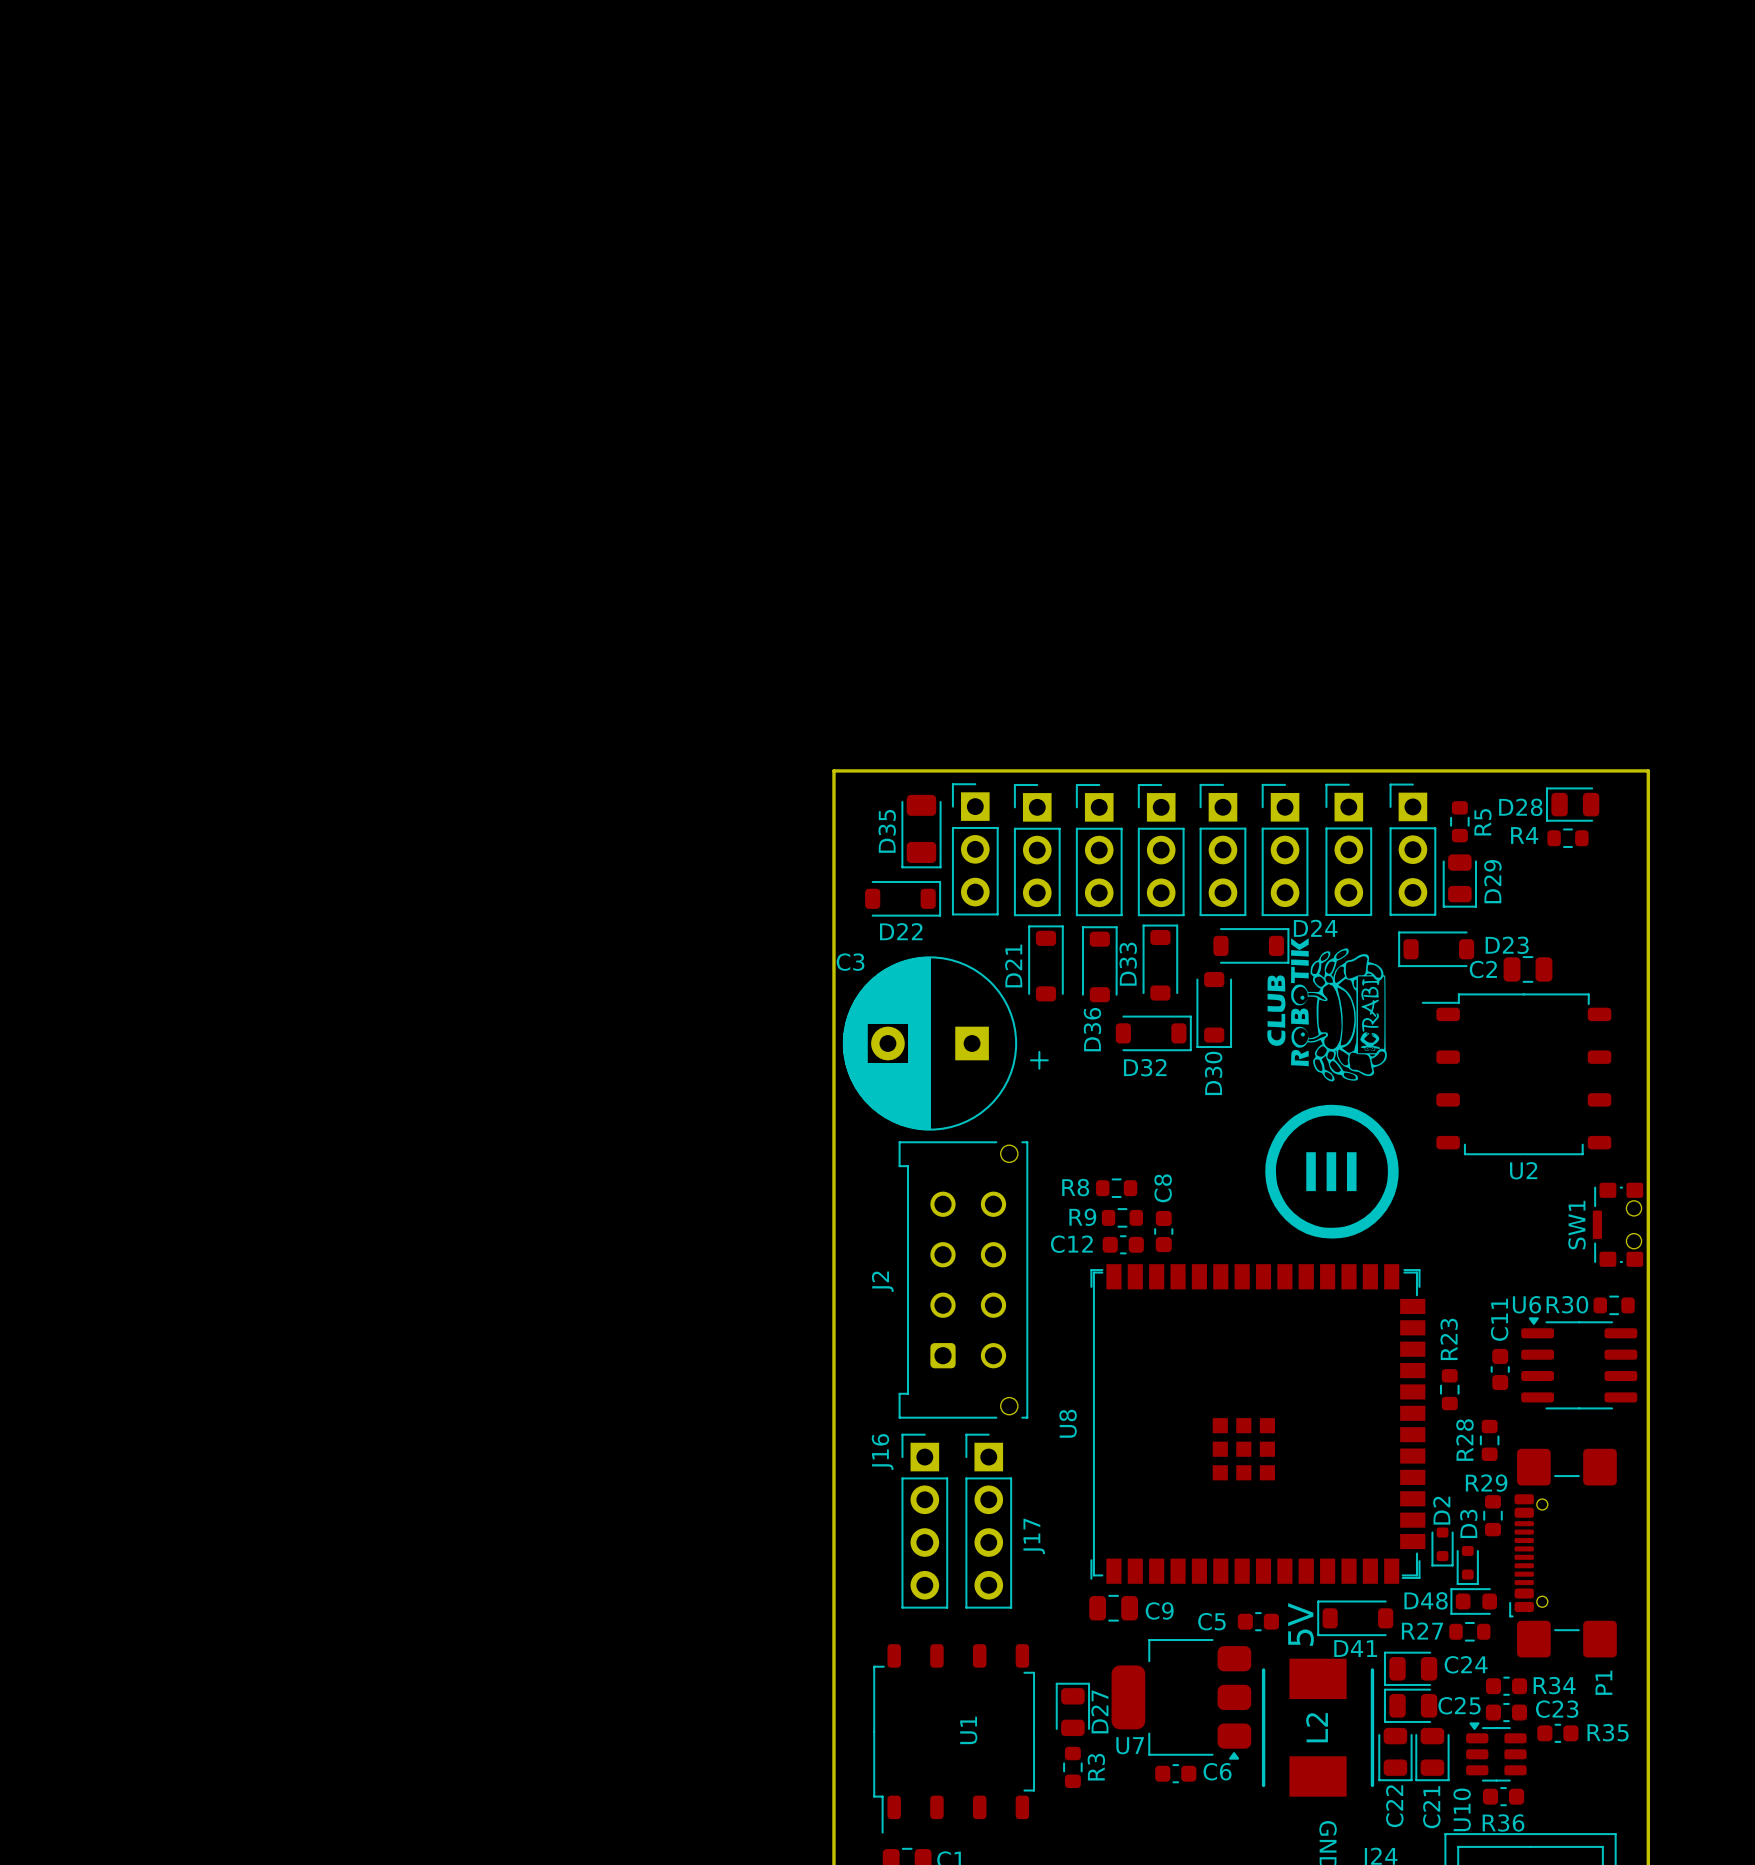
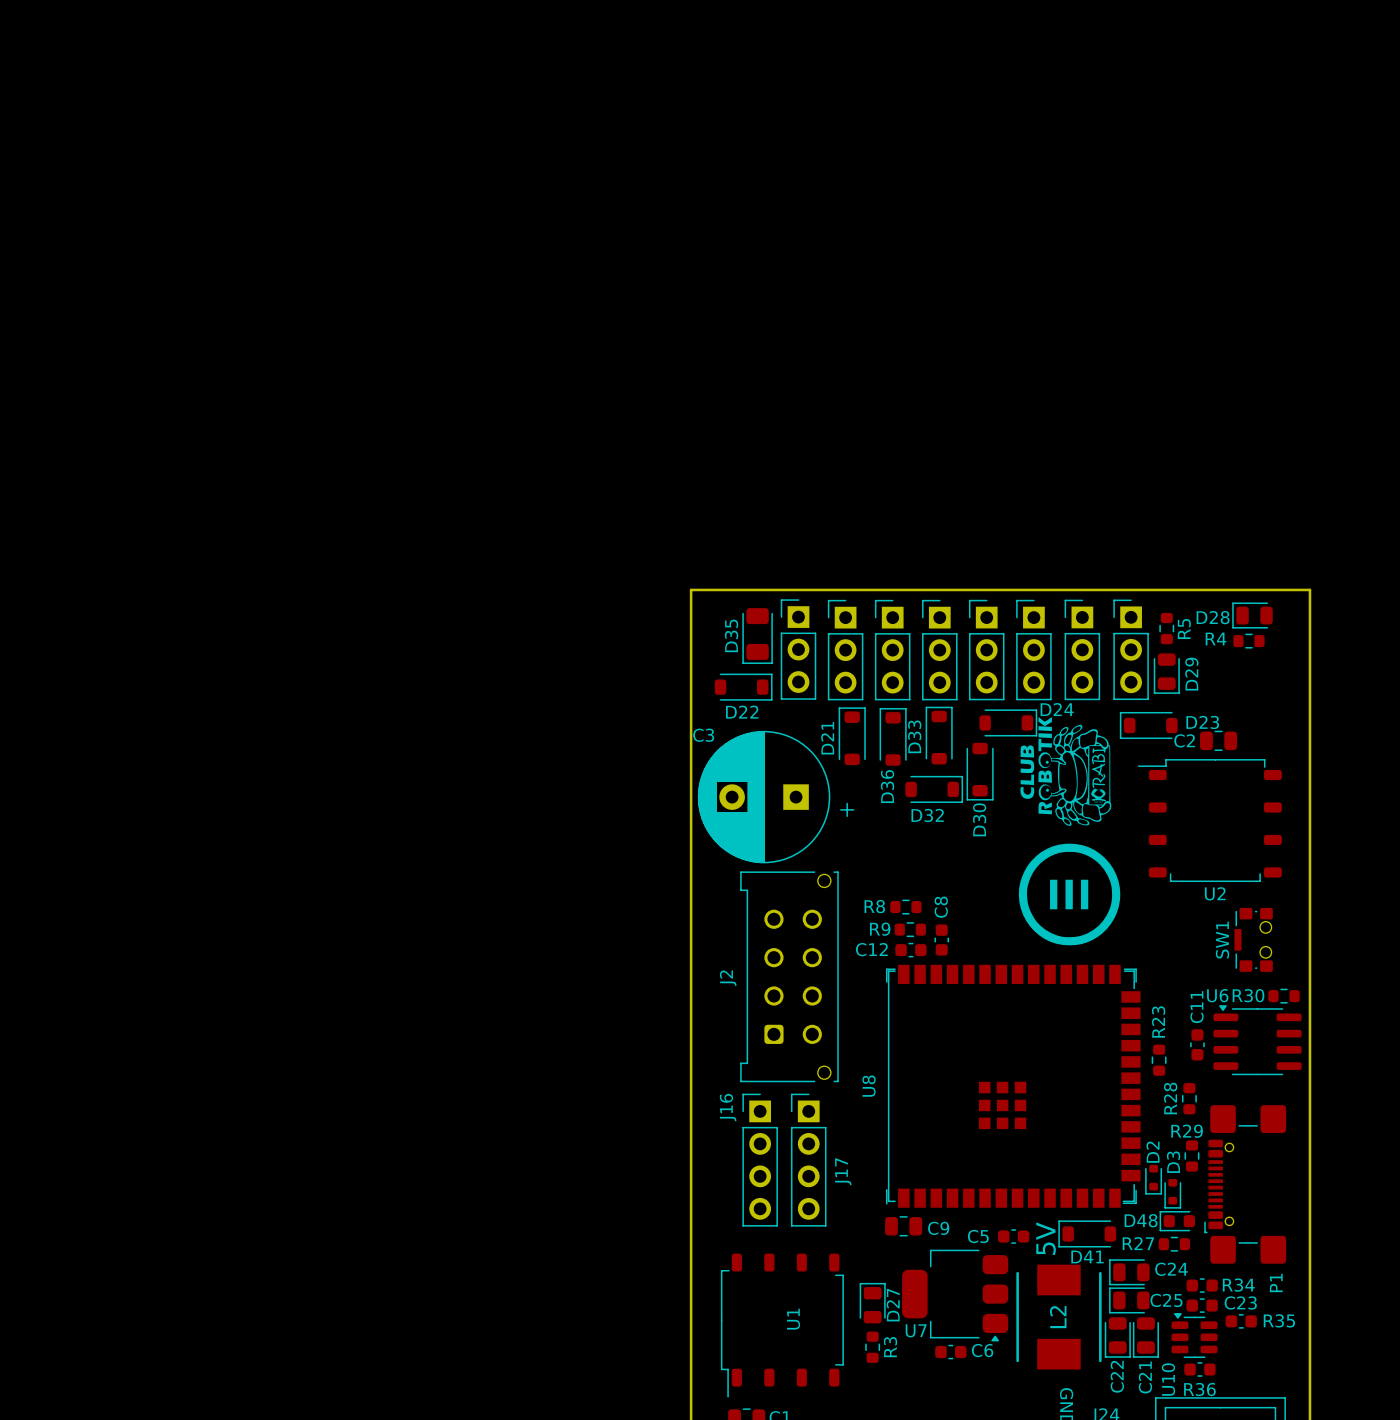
SW1 position: (1618, 1224) -> (1253, 939)

